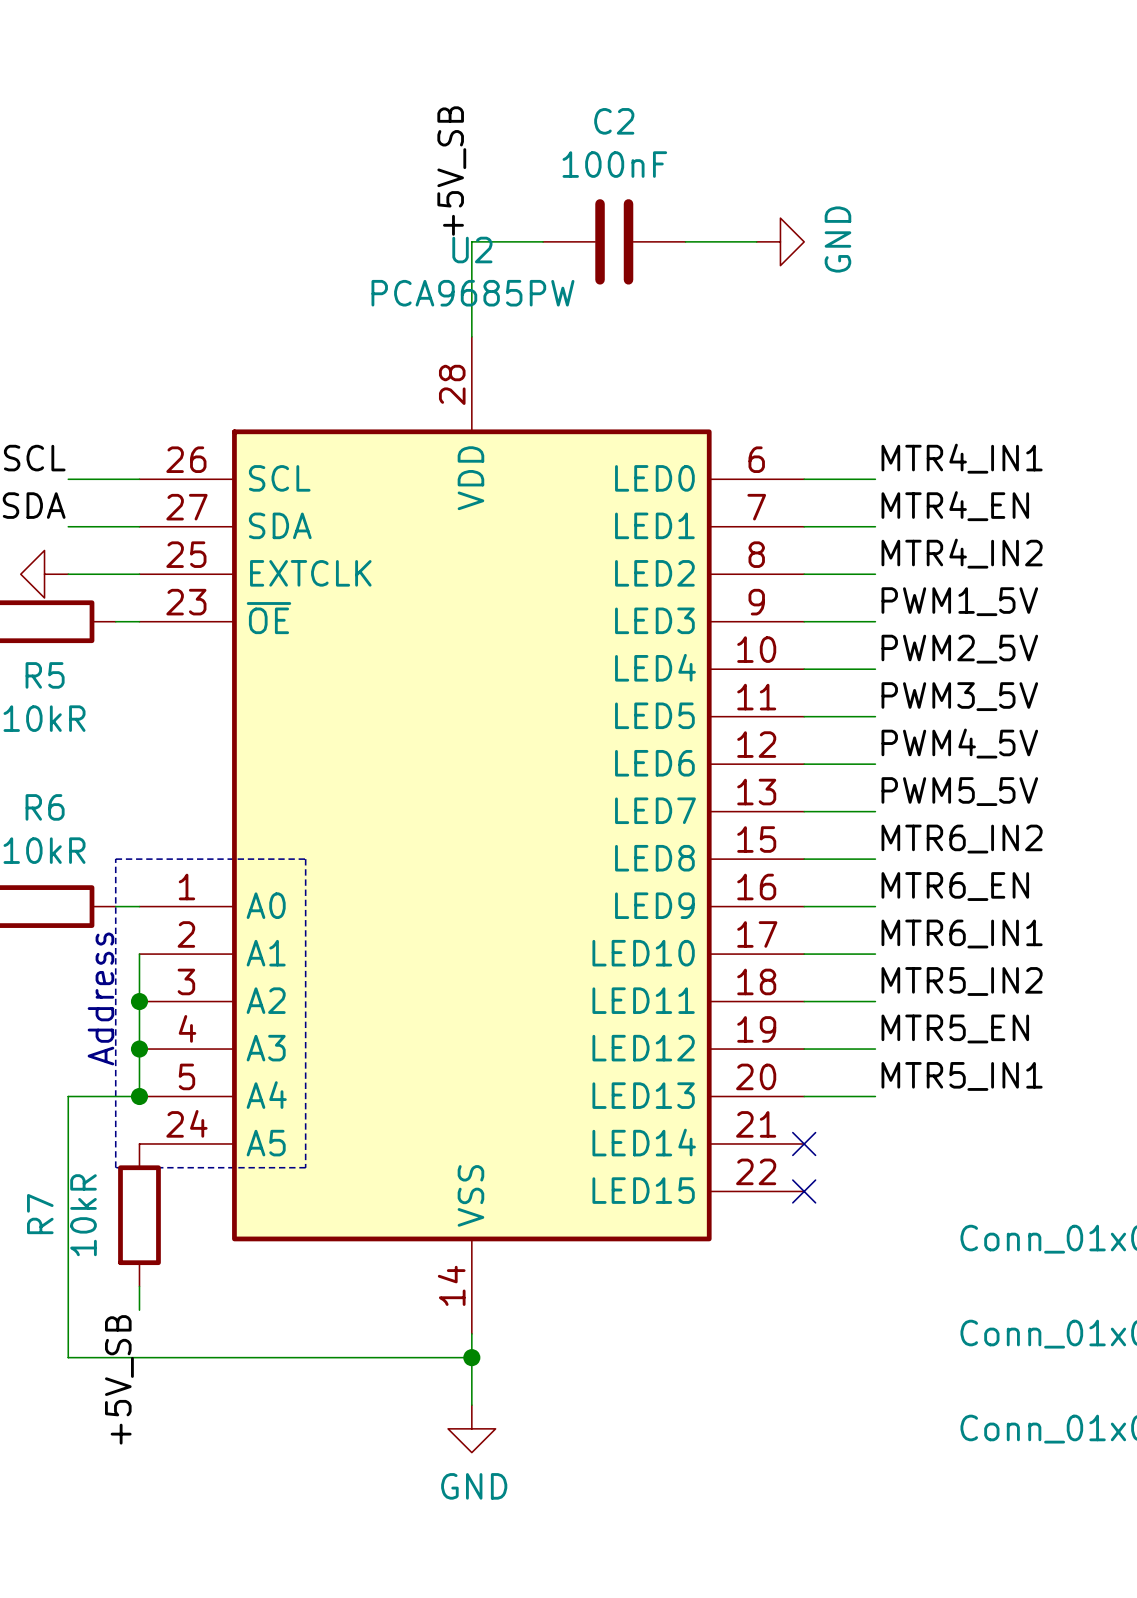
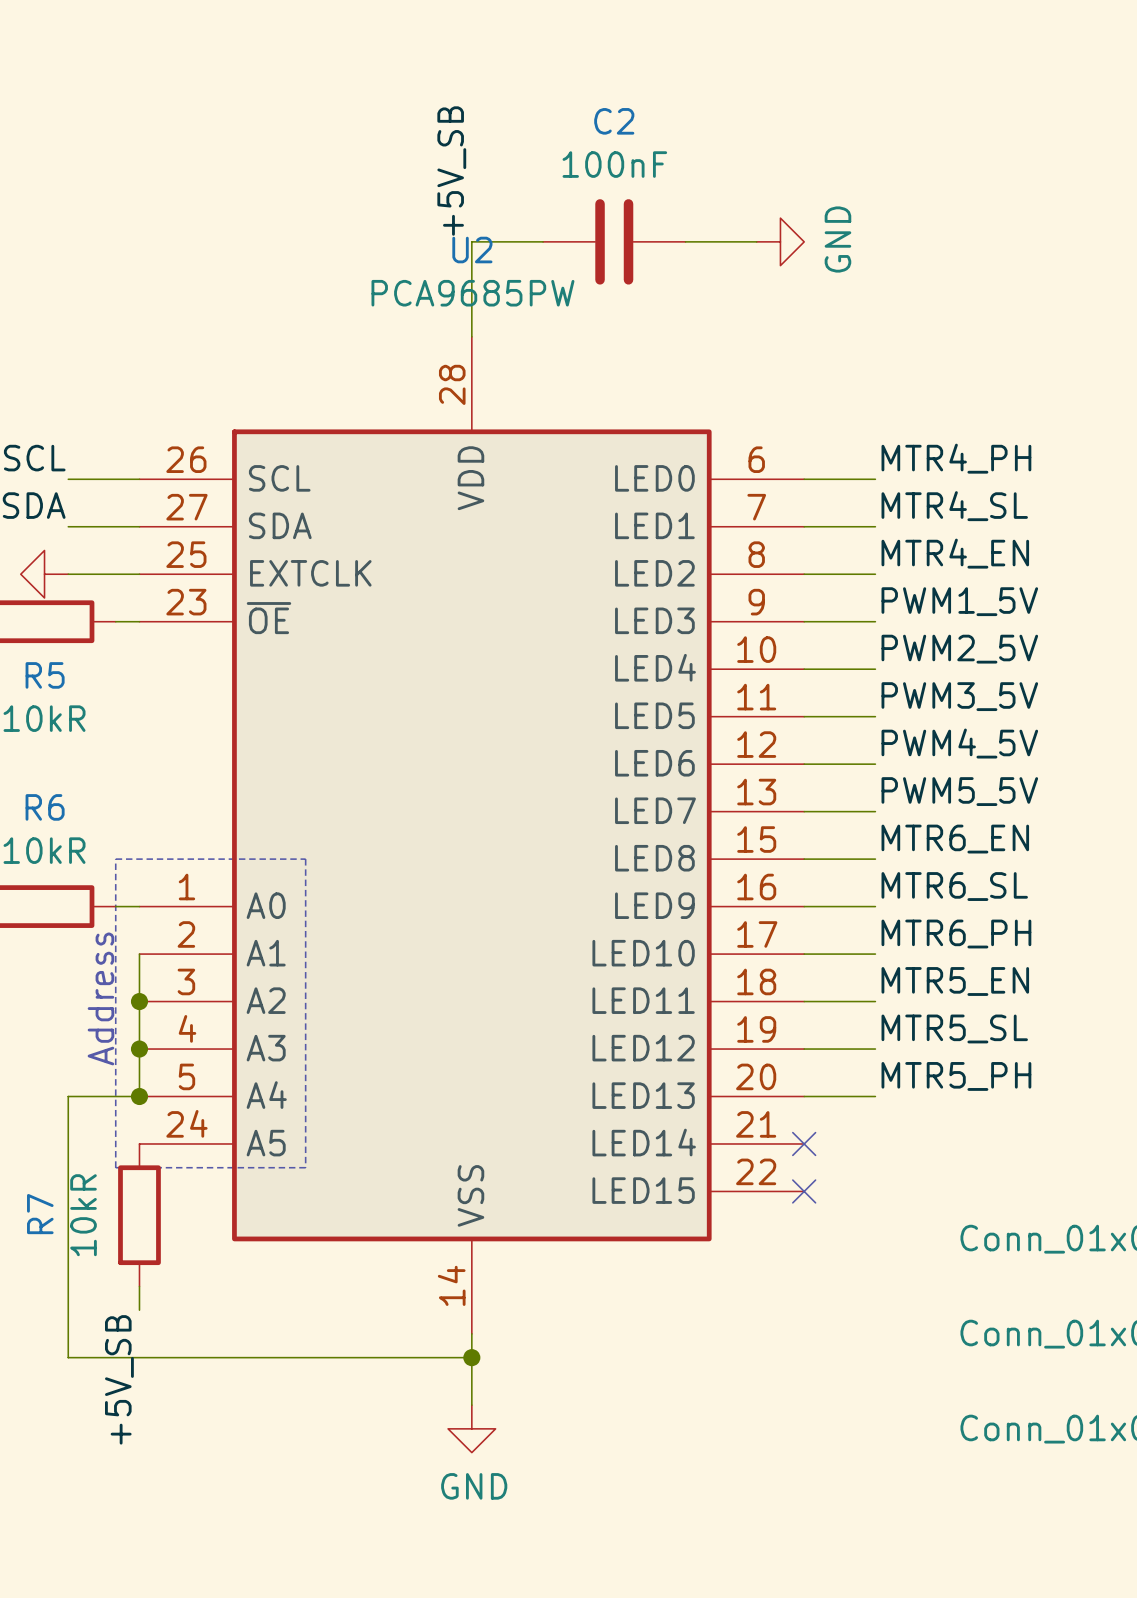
label: MTR4_IN1 (962, 458) -> MTR4_PH (956, 458)
label: MTR4_EN (955, 506) -> MTR4_SL (954, 506)
label: MTR4_IN2 (962, 553) -> MTR4_EN (955, 553)
label: MTR6_IN2 (962, 839) -> MTR6_EN (955, 839)
label: MTR6_EN (955, 886) -> MTR6_SL (954, 886)
label: MTR6_IN1 (962, 934) -> MTR6_PH (956, 934)
label: MTR5_IN2 (962, 981) -> MTR5_EN (955, 981)
label: MTR5_EN (955, 1028) -> MTR5_SL (954, 1028)
label: MTR5_IN1 (962, 1076) -> MTR5_PH (956, 1076)

